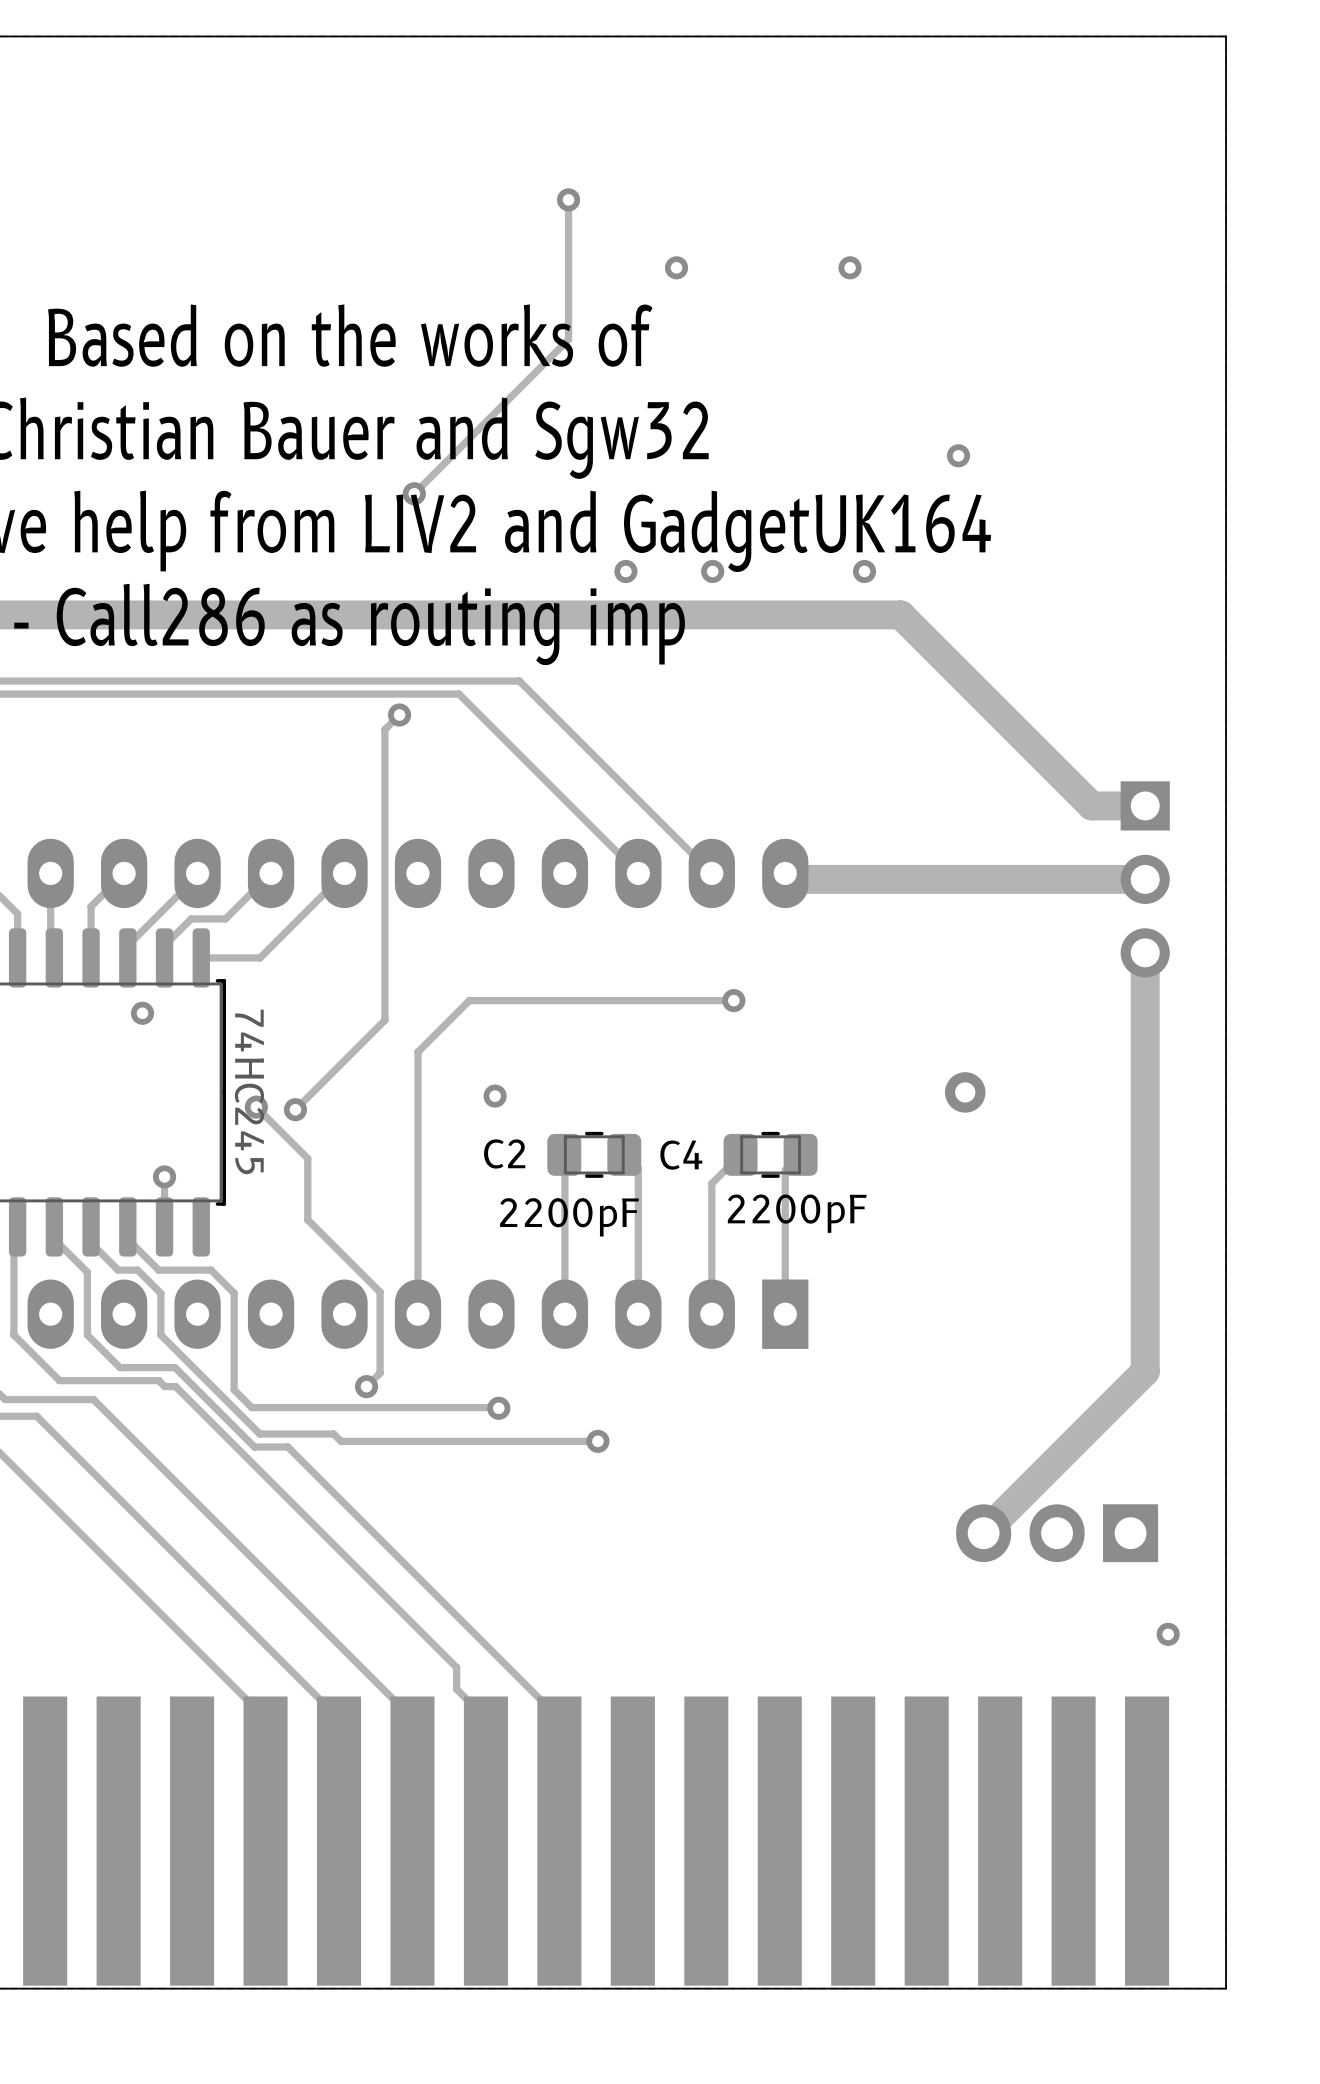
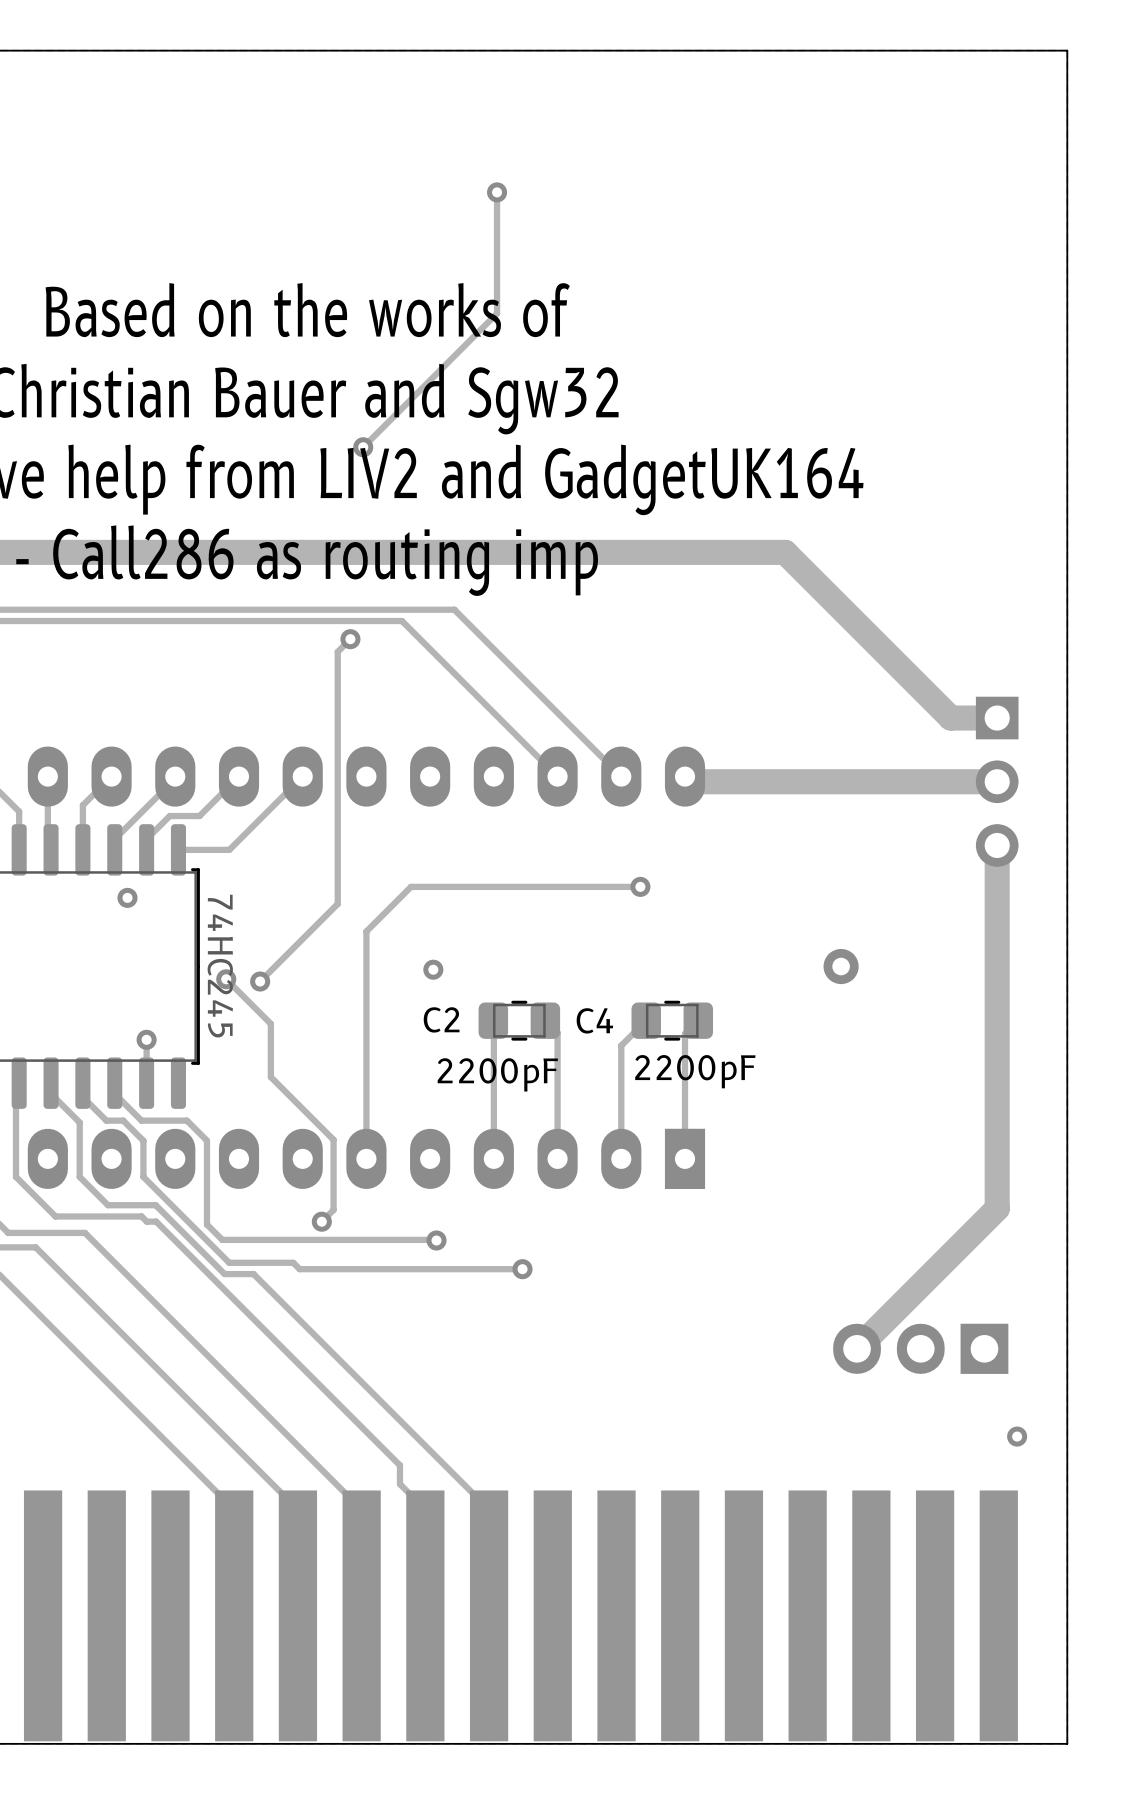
via: (676, 267) -> none
via: (850, 267) -> none
via: (958, 455) -> none
via: (625, 571) -> none
via: (712, 571) -> none
via: (864, 571) -> none

